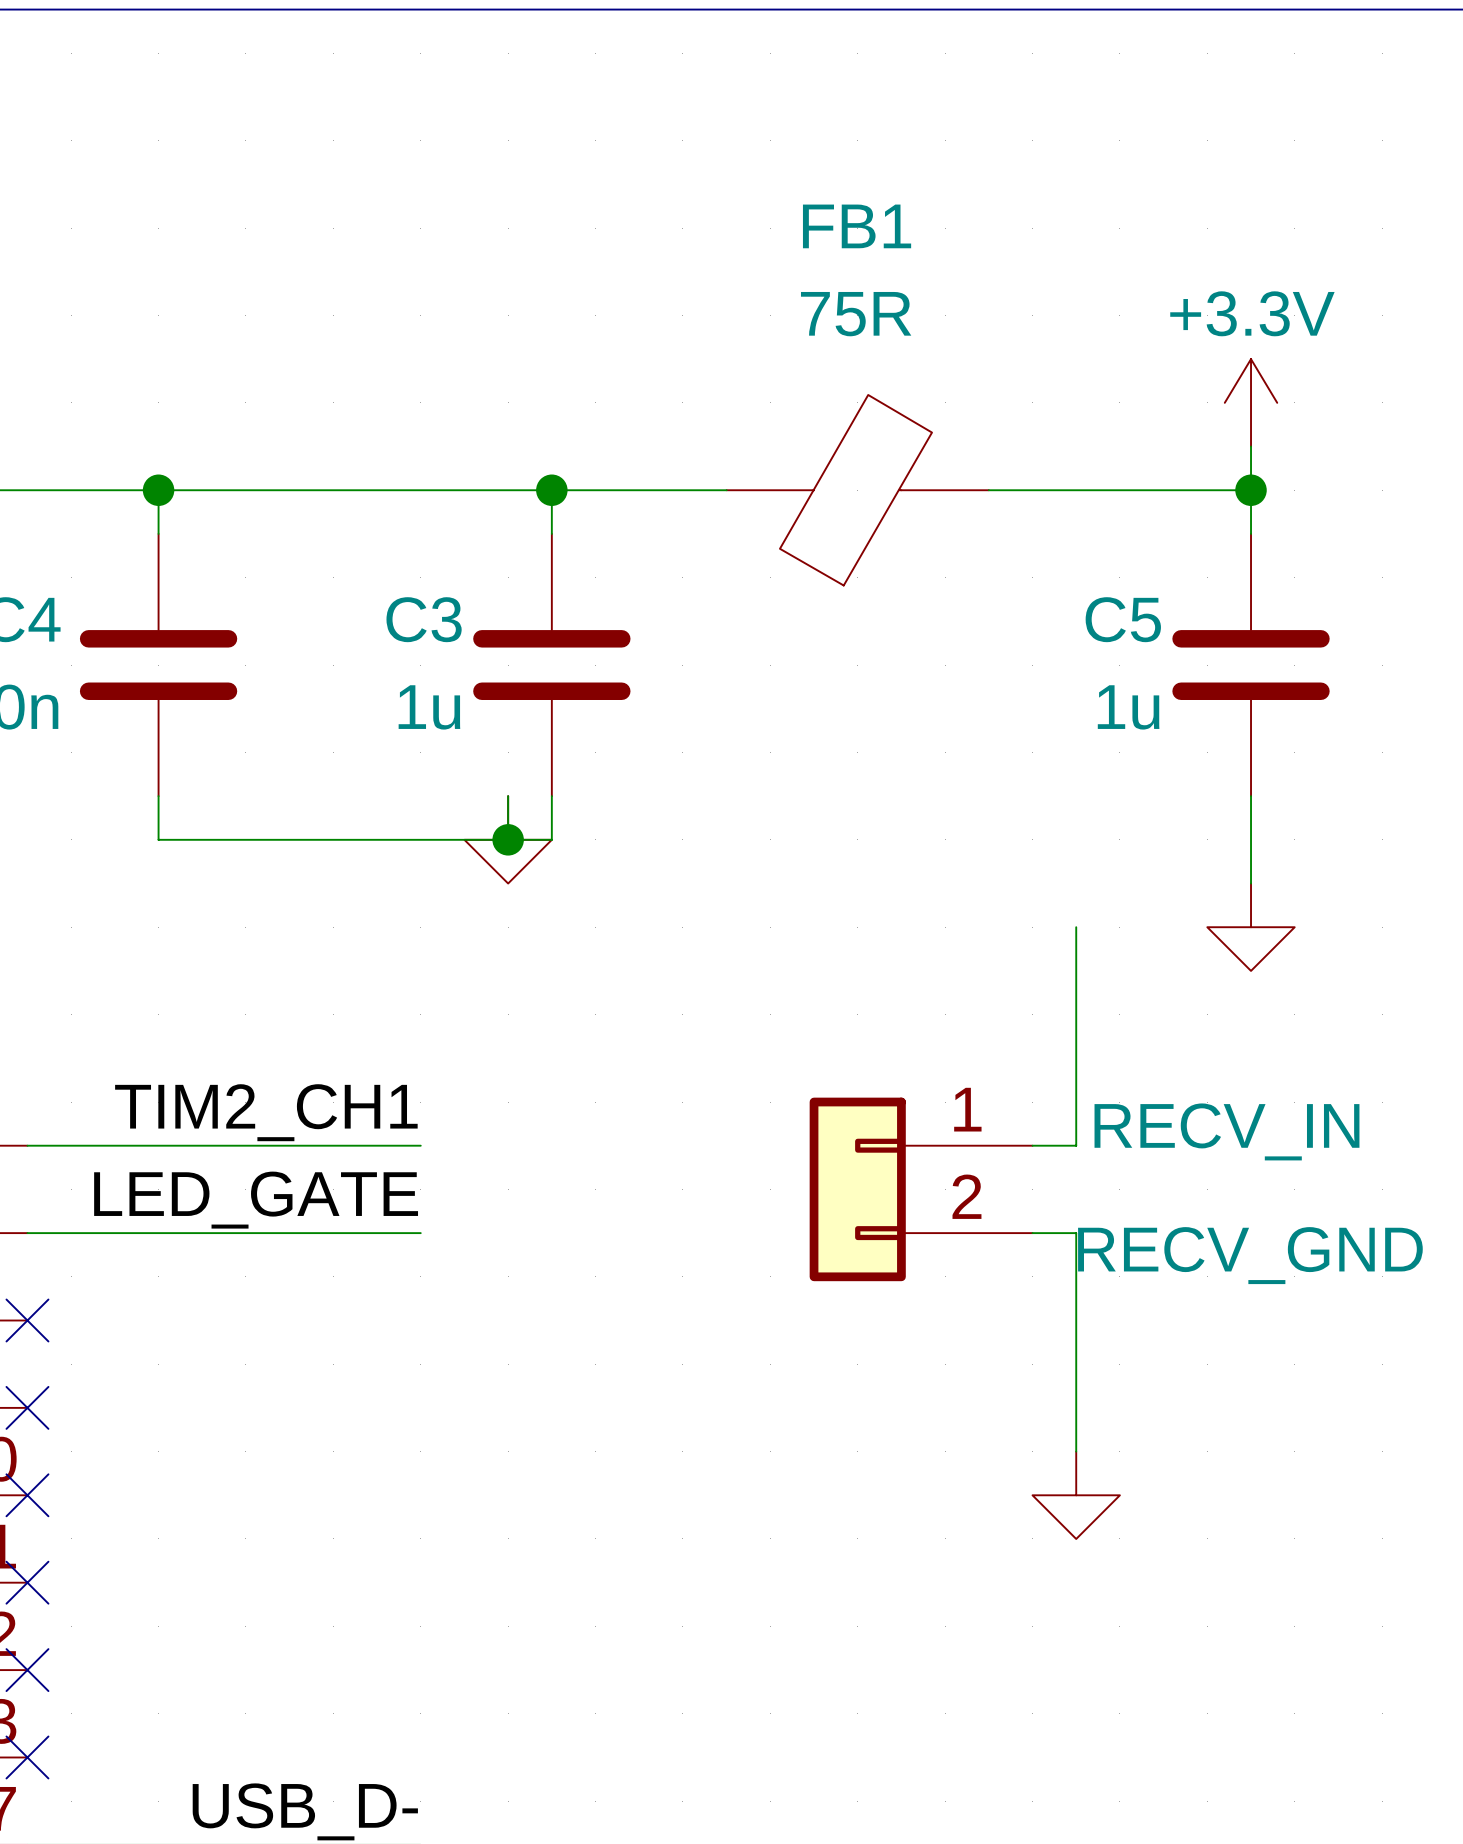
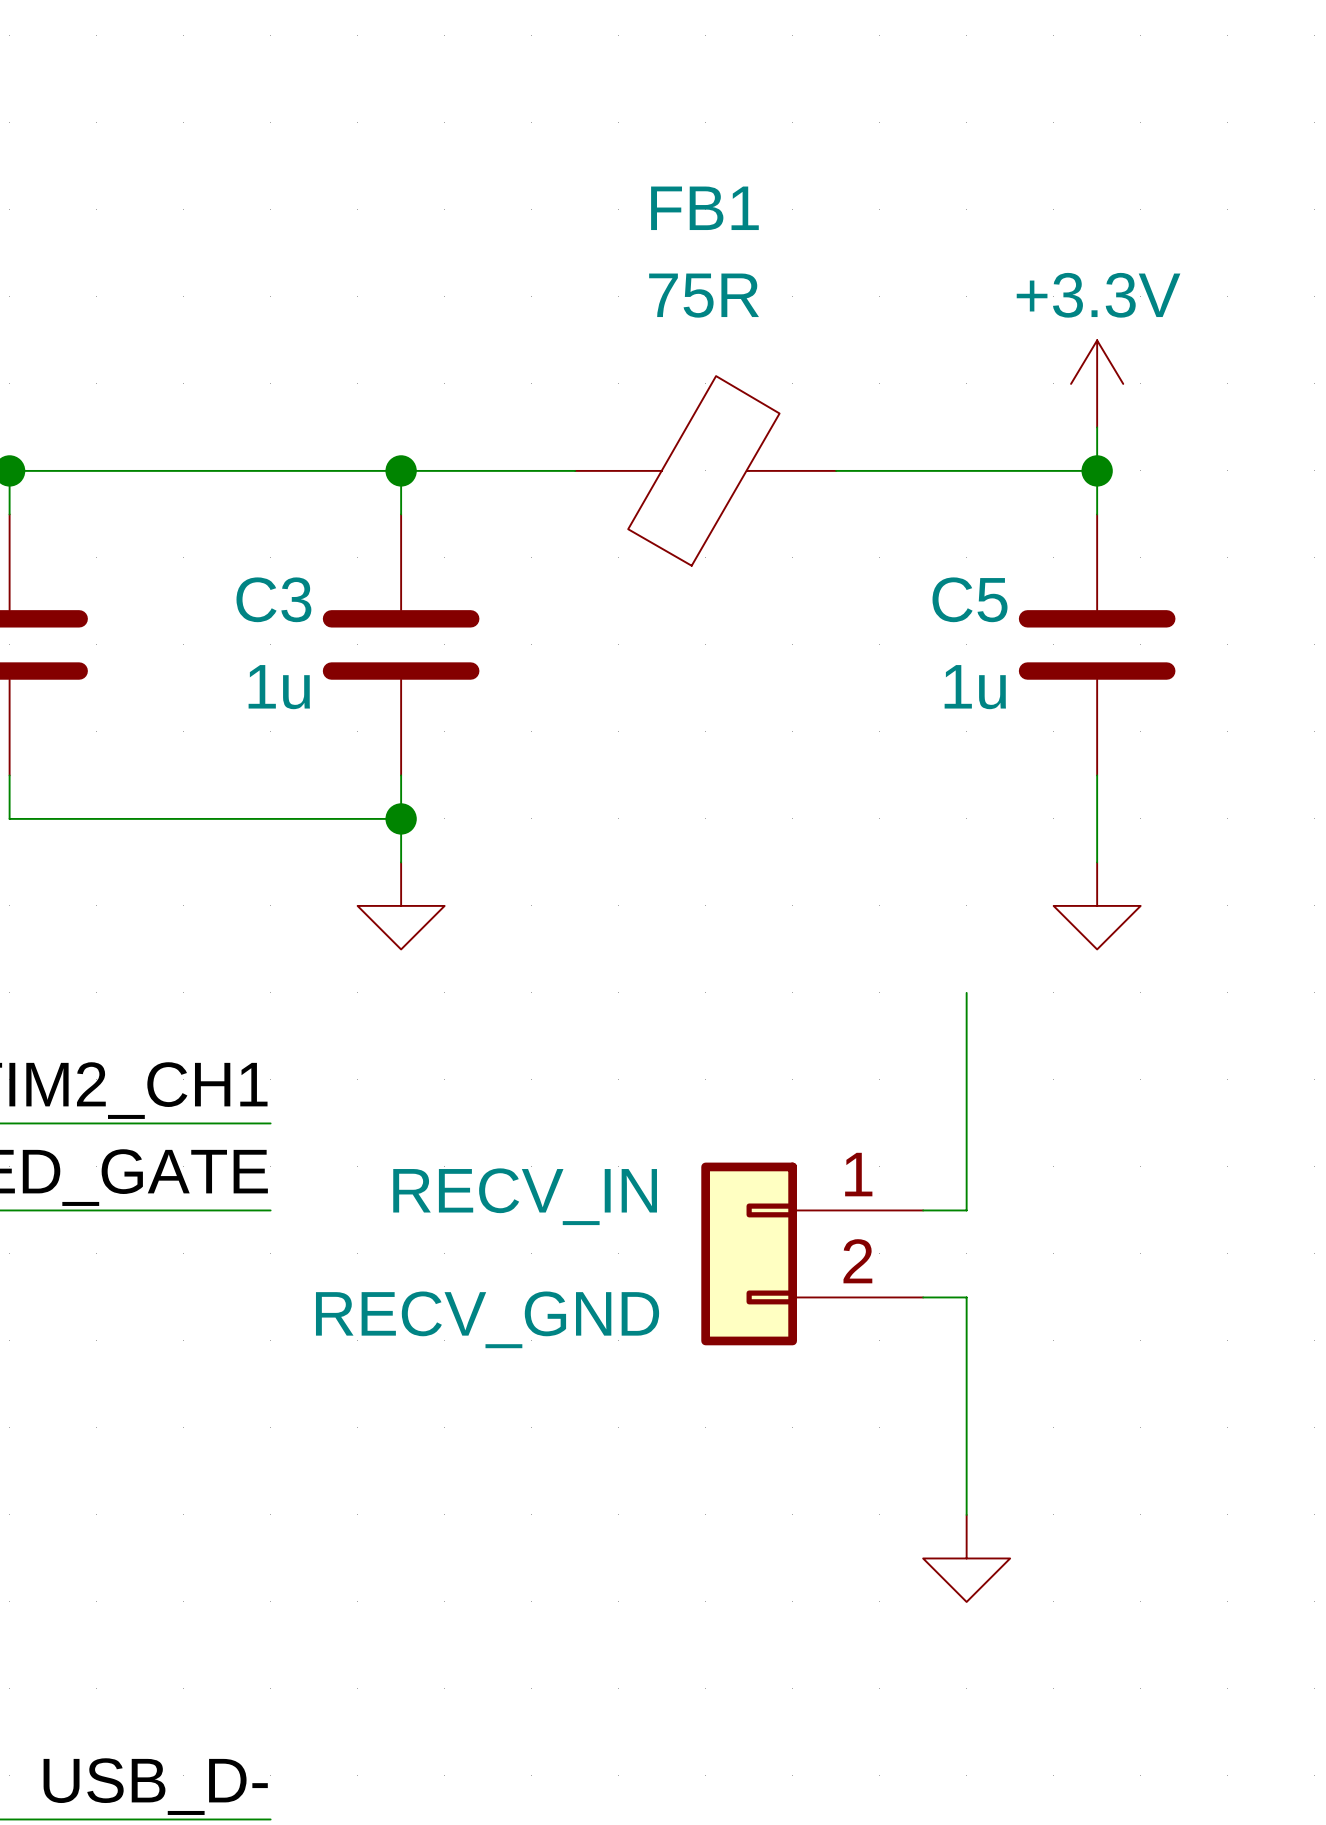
wire: (508, 796) (508, 839) -> (401, 818) (401, 862)
junction position: (508, 839) -> (401, 818)
power symbol position: (508, 839) -> (401, 905)
wire: (1076, 927) (1076, 1145) (1032, 1145) -> (966, 992) (966, 1210) (923, 1210)
RECV_IN name position: RECV_IN (1226, 1131) -> RECV_IN (525, 1196)
RECV_IN position: (921, 1189) -> (812, 1253)
wire: (1032, 1233) (1076, 1233) (1076, 1451) -> (923, 1297) (966, 1297) (966, 1514)
RECV_IN value position: RECV_GND (1250, 1255) -> RECV_GND (487, 1319)
power symbol position: (1076, 1495) -> (966, 1558)

